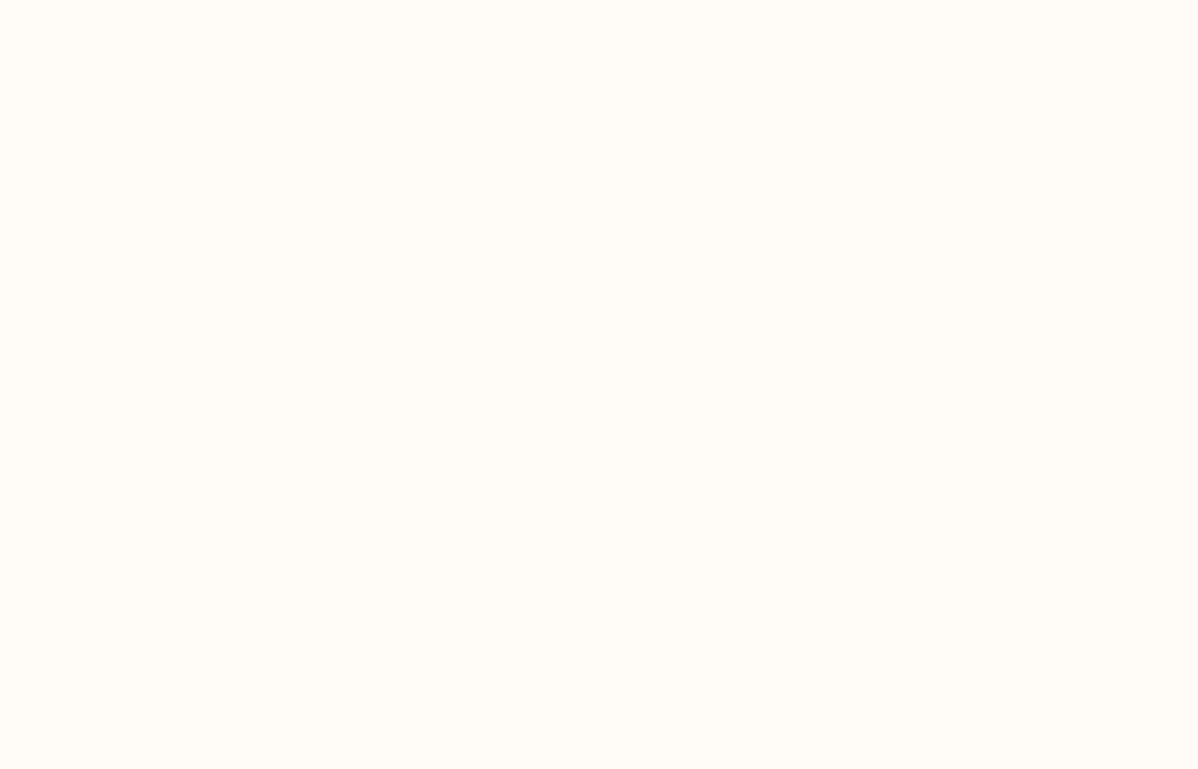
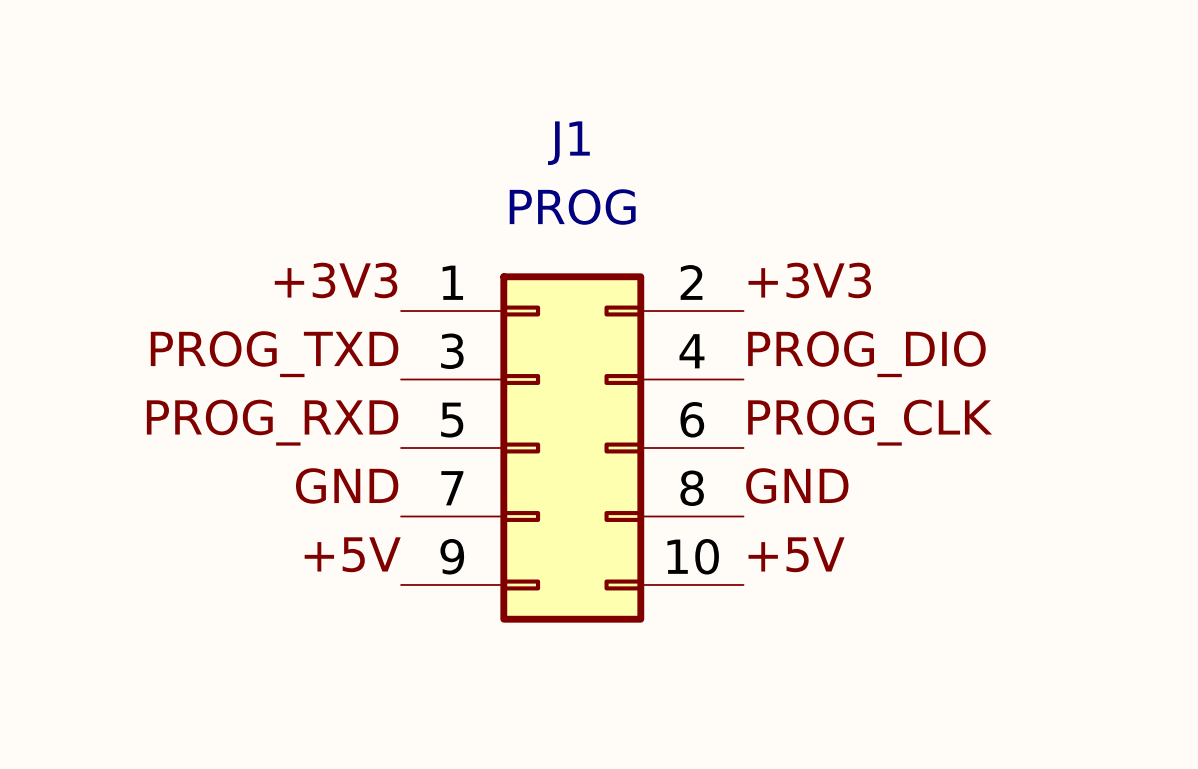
label: none -> +3V3 (336, 280)
label: none -> +3V3 (809, 280)
label: none -> PROG_TXD (274, 354)
label: none -> PROG_DIO (866, 354)
label: none -> PROG_RXD (272, 422)
label: none -> PROG_CLK (870, 422)
J1: none -> PROG (572, 447)
label: none -> GND (347, 485)
label: none -> GND (797, 485)
label: none -> +5V (352, 554)
label: none -> +5V (796, 554)

